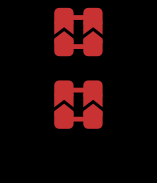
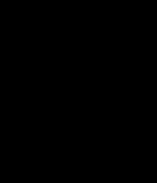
part: (78, 32) -> none
part: (78, 104) -> none

